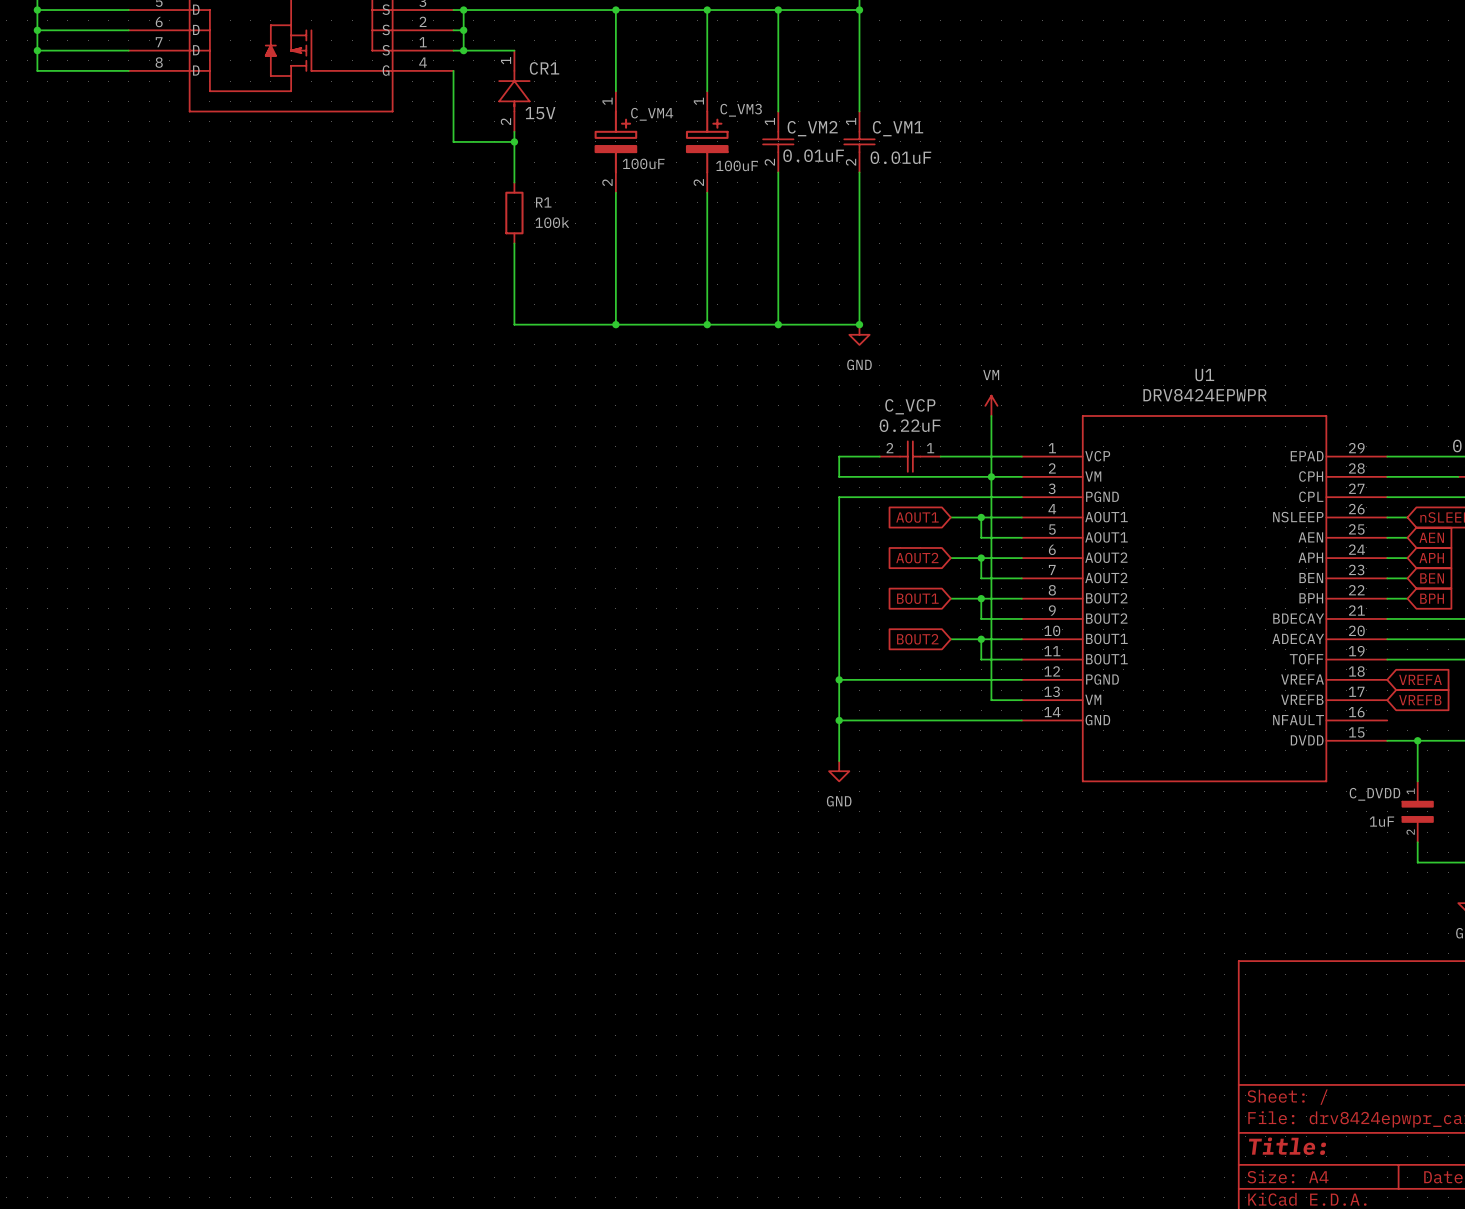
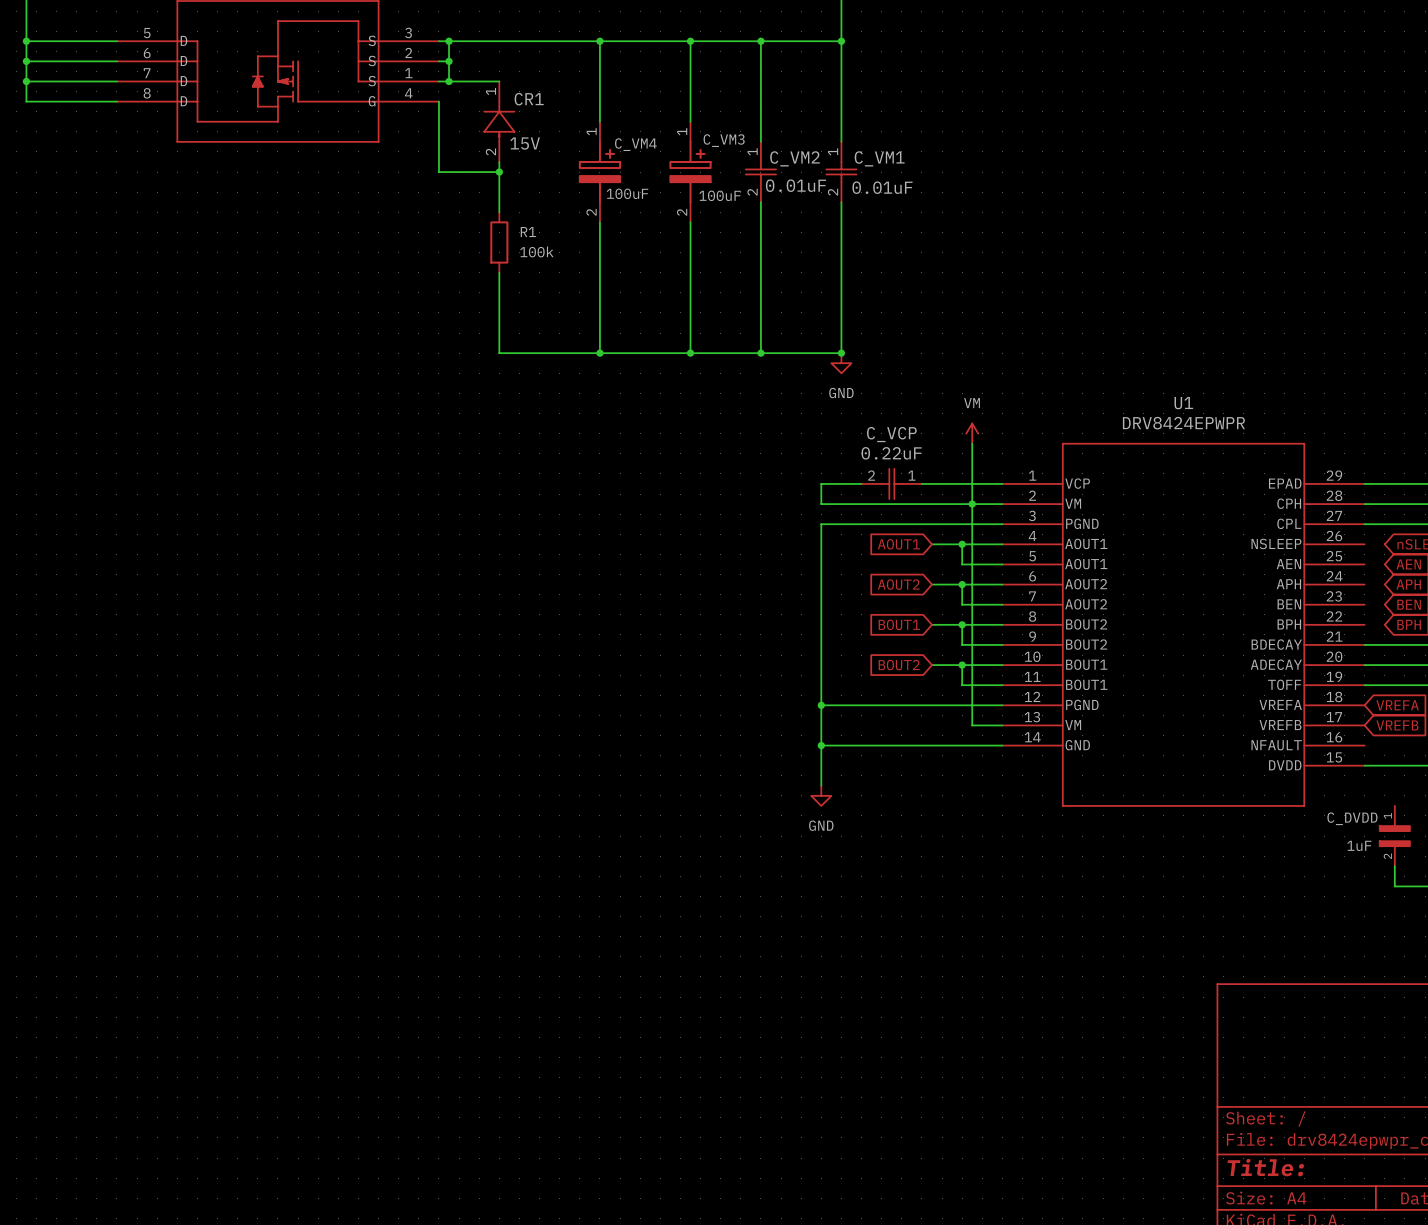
wire: (1387, 517) (1407, 517) -> none
wire: (1387, 537) (1407, 537) -> none
wire: (1387, 558) (1407, 558) -> none
wire: (1387, 578) (1407, 578) -> none
wire: (1387, 598) (1407, 598) -> none
wire: (1417, 740) (1417, 781) -> none
junction: (1417, 740) -> none

